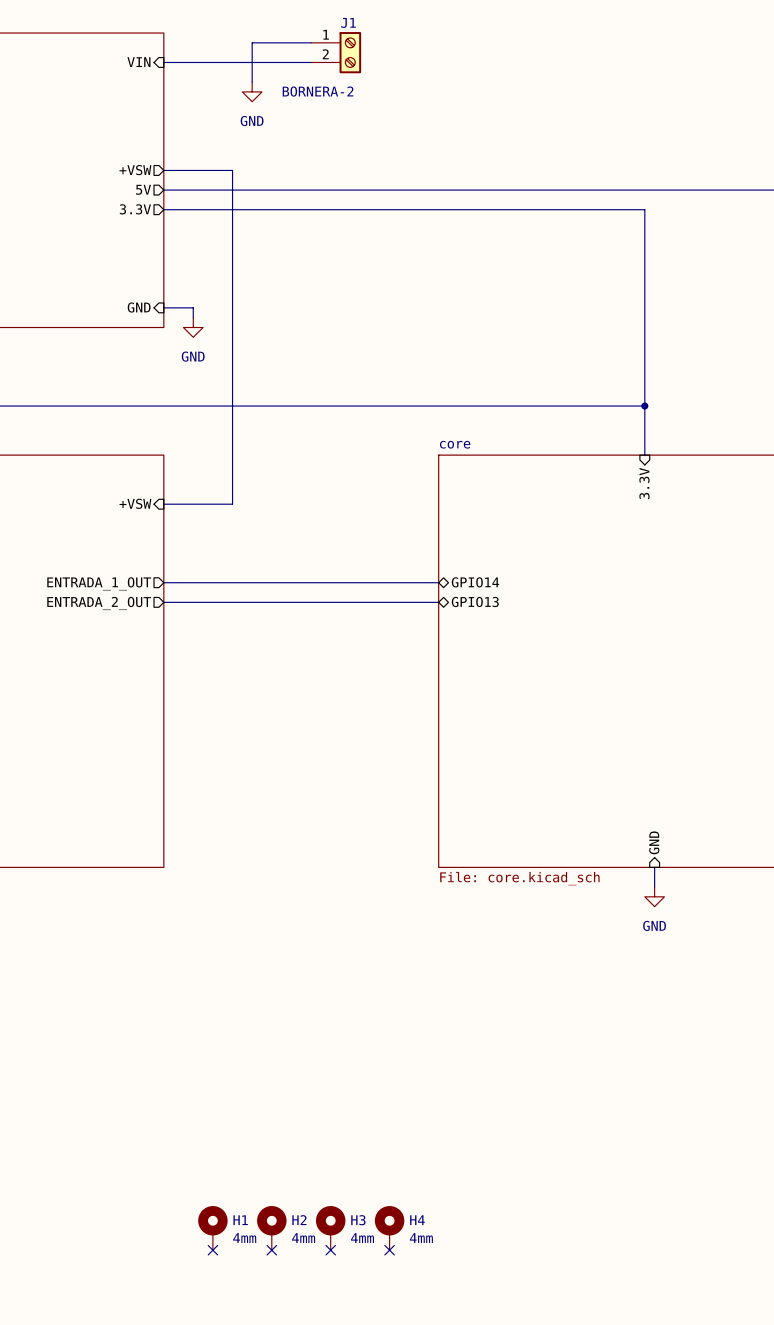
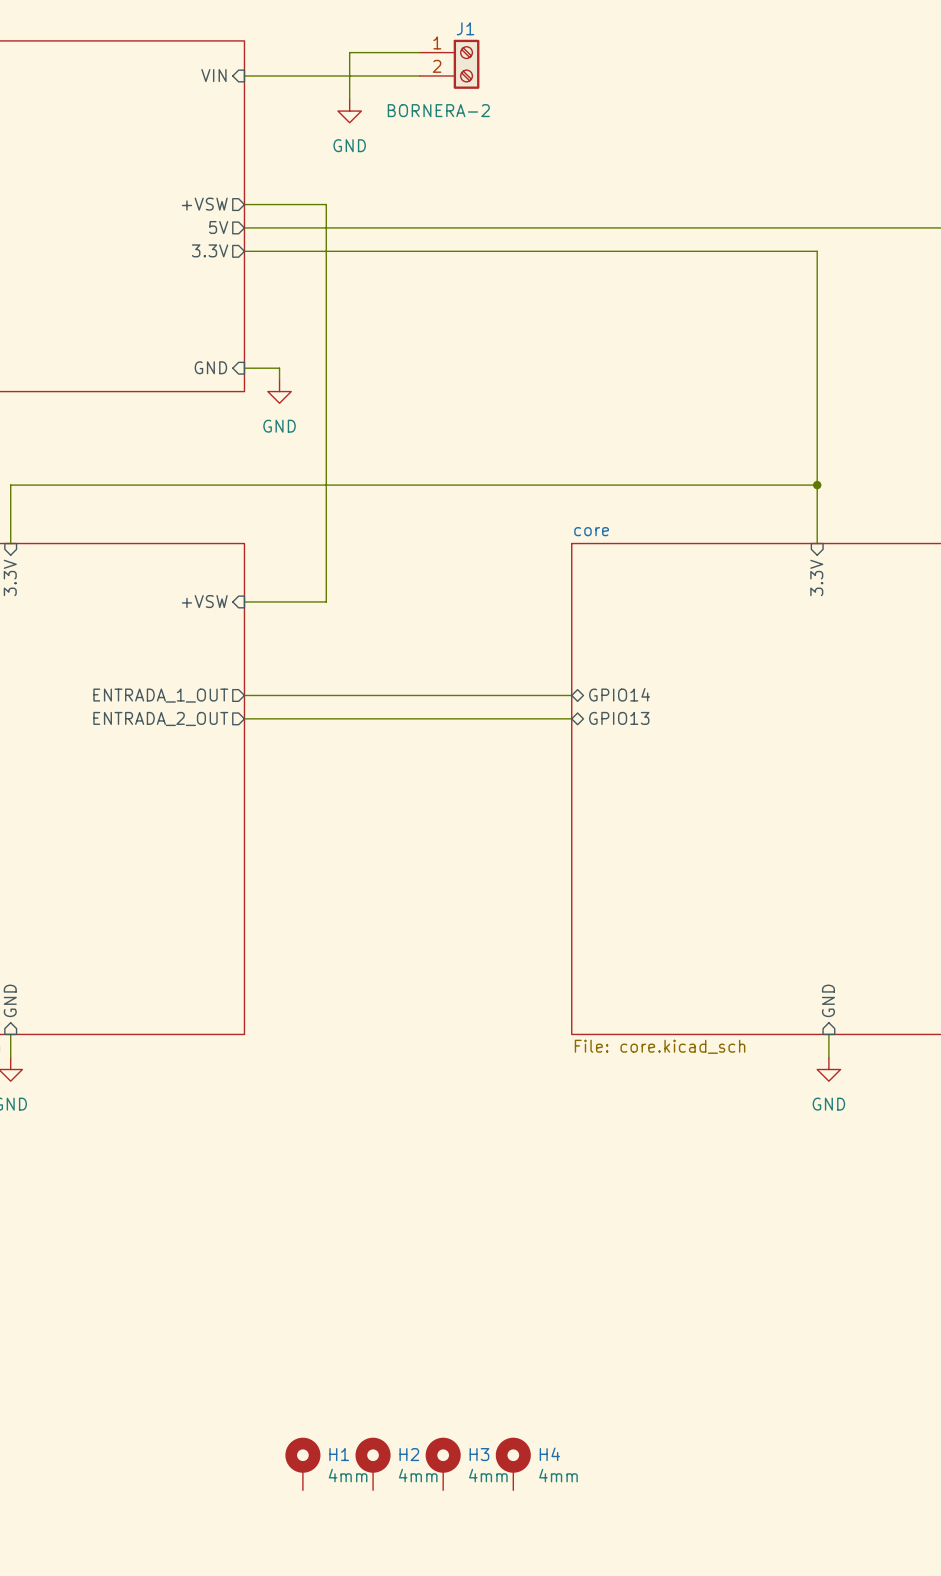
no-connect mark: (212, 1250) -> none
no-connect mark: (271, 1250) -> none
no-connect mark: (330, 1250) -> none
no-connect mark: (389, 1250) -> none

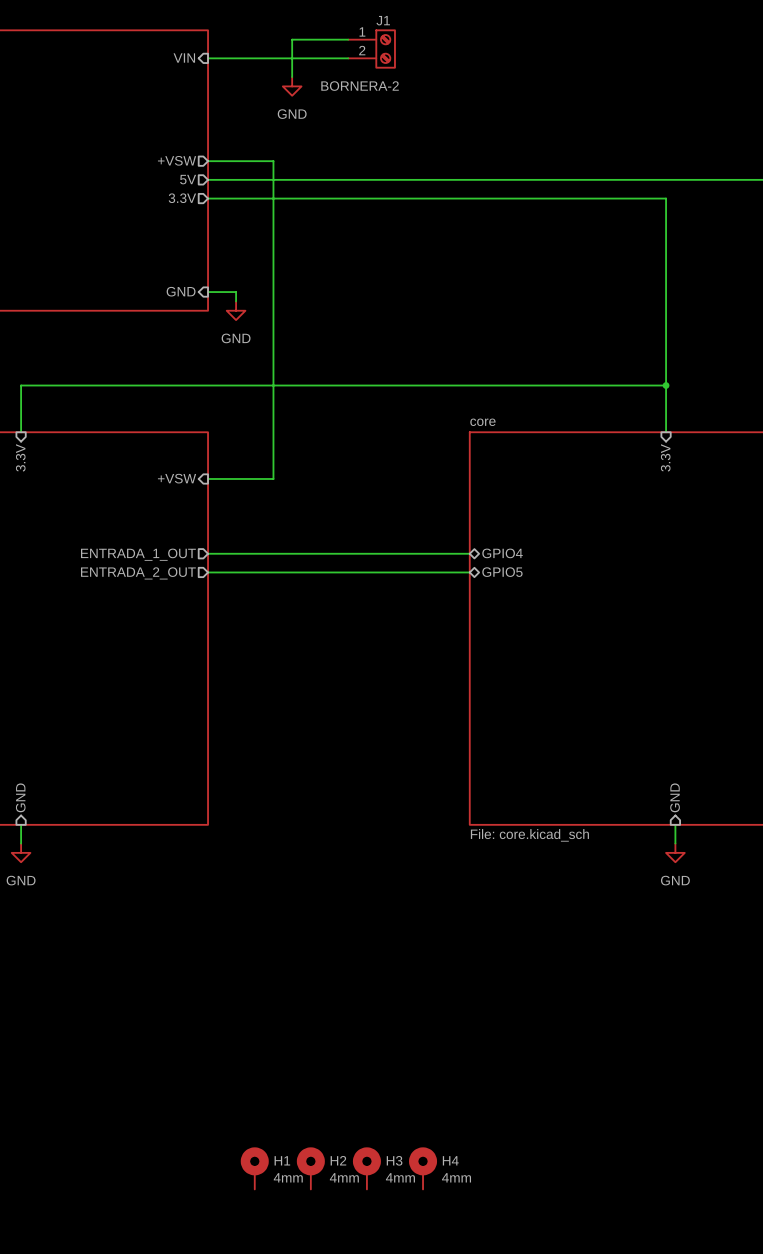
sheet pin: GPIO14 (619, 694) -> GPIO4 (502, 553)
sheet pin: GPIO13 (619, 718) -> GPIO5 (502, 572)

